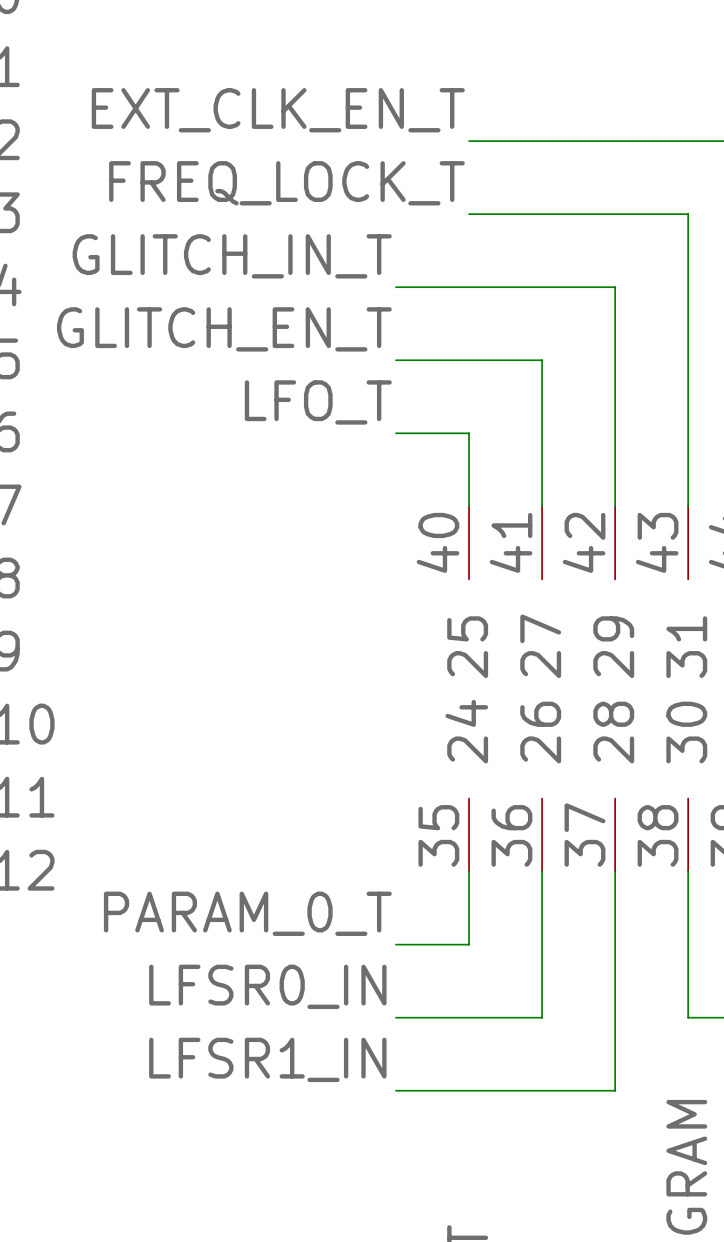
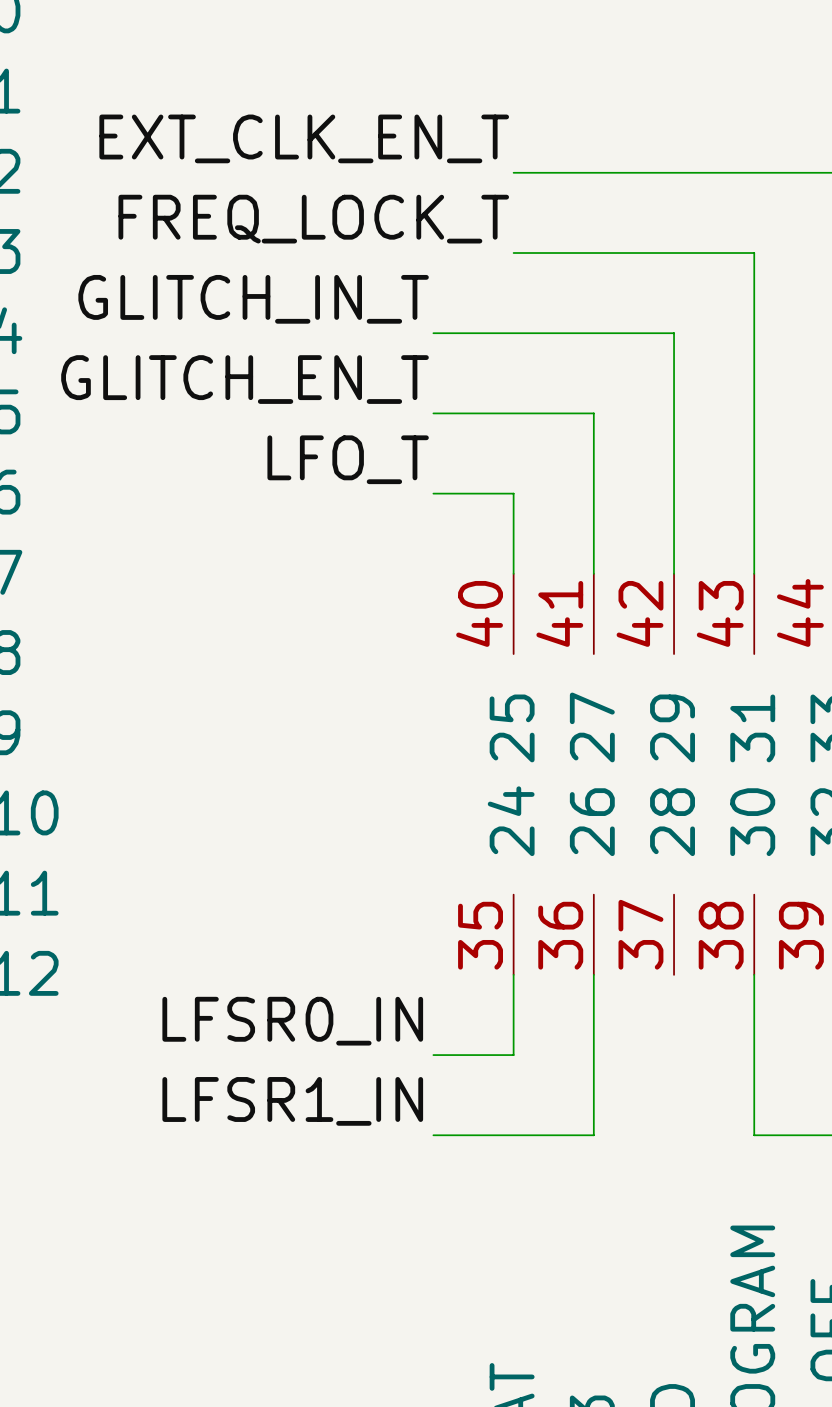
wire: (615, 871) (615, 1090) (395, 1090) -> none
label: PARAM_0_T (247, 913) -> LFSR0_IN (292, 1021)
label: LFSR0_IN (267, 986) -> LFSR1_IN (292, 1101)
label: LFSR1_IN (267, 1059) -> none

